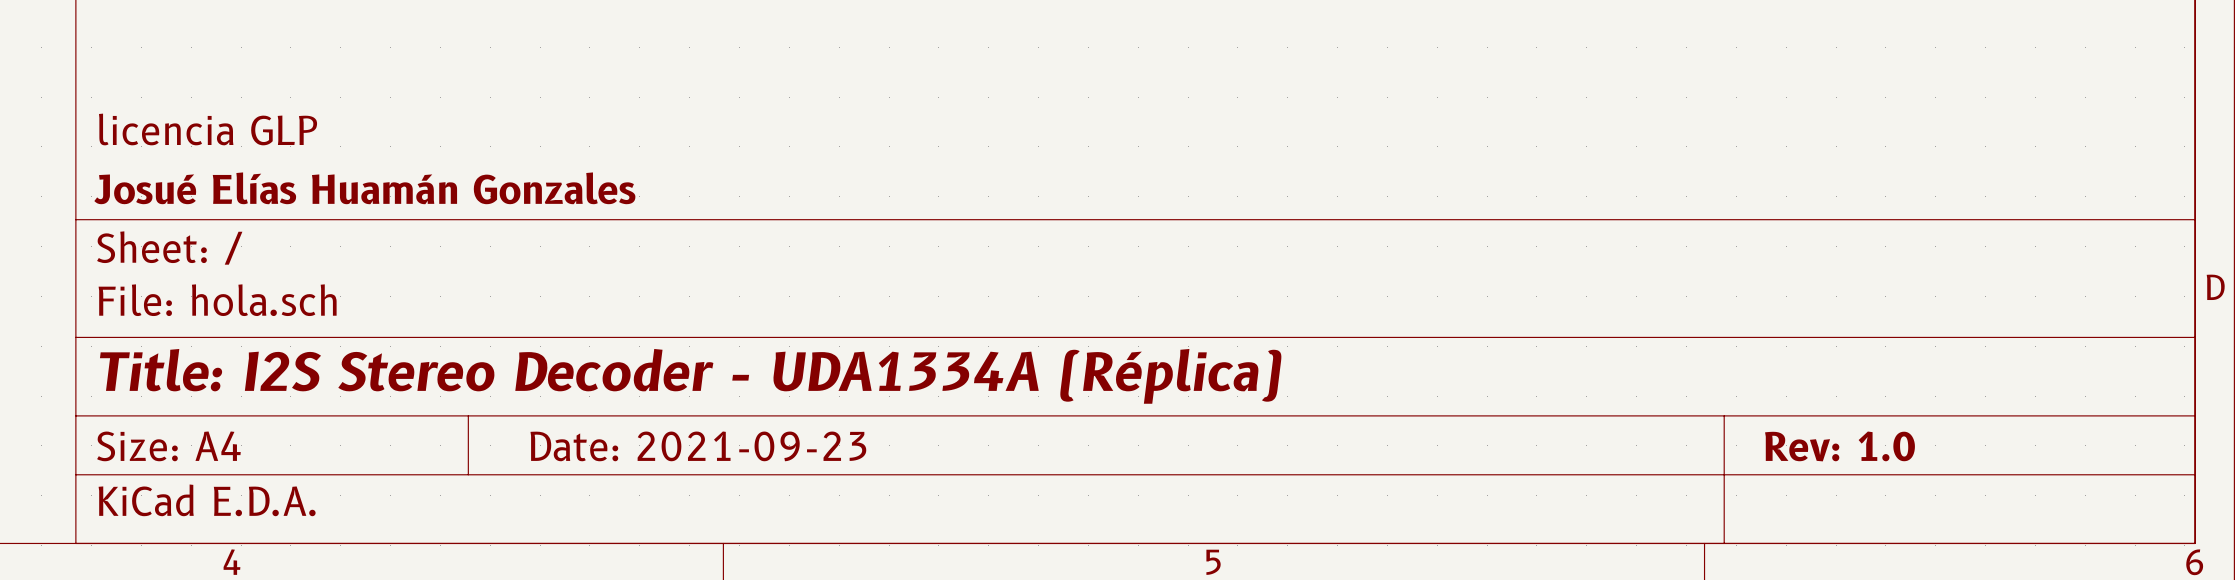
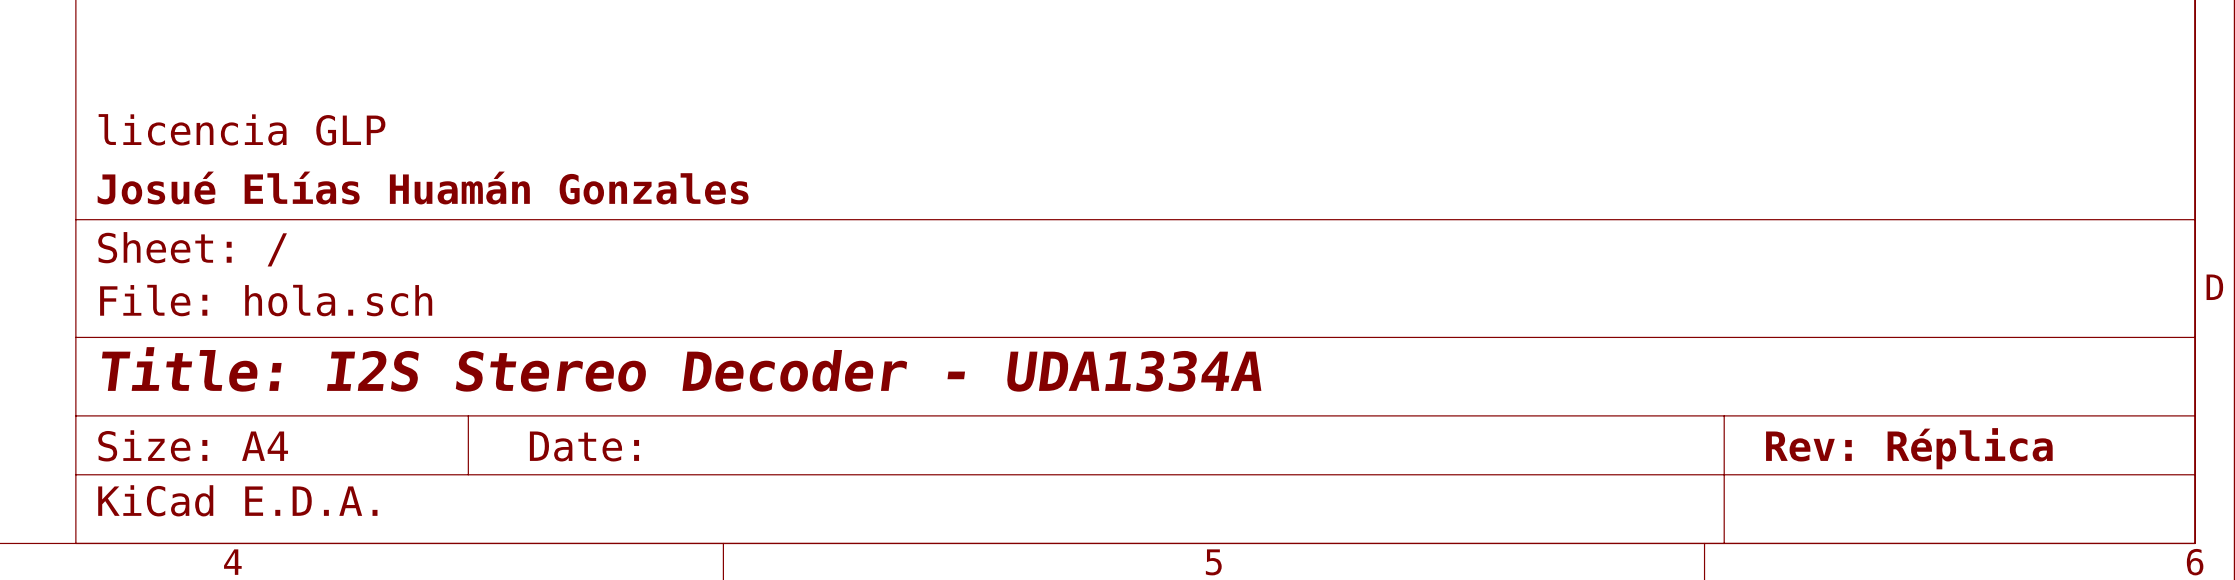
title block: Title: I2S Stereo Decoder - UDA1334A (Réplica) (690, 376) -> Title: I2S Stereo Decoder - UDA1334A (681, 369)
title block: Date: 2021-09-23 (698, 446) -> Date: (584, 446)
title block: Rev: 1.0 (1840, 446) -> Rev: Réplica (1909, 448)

